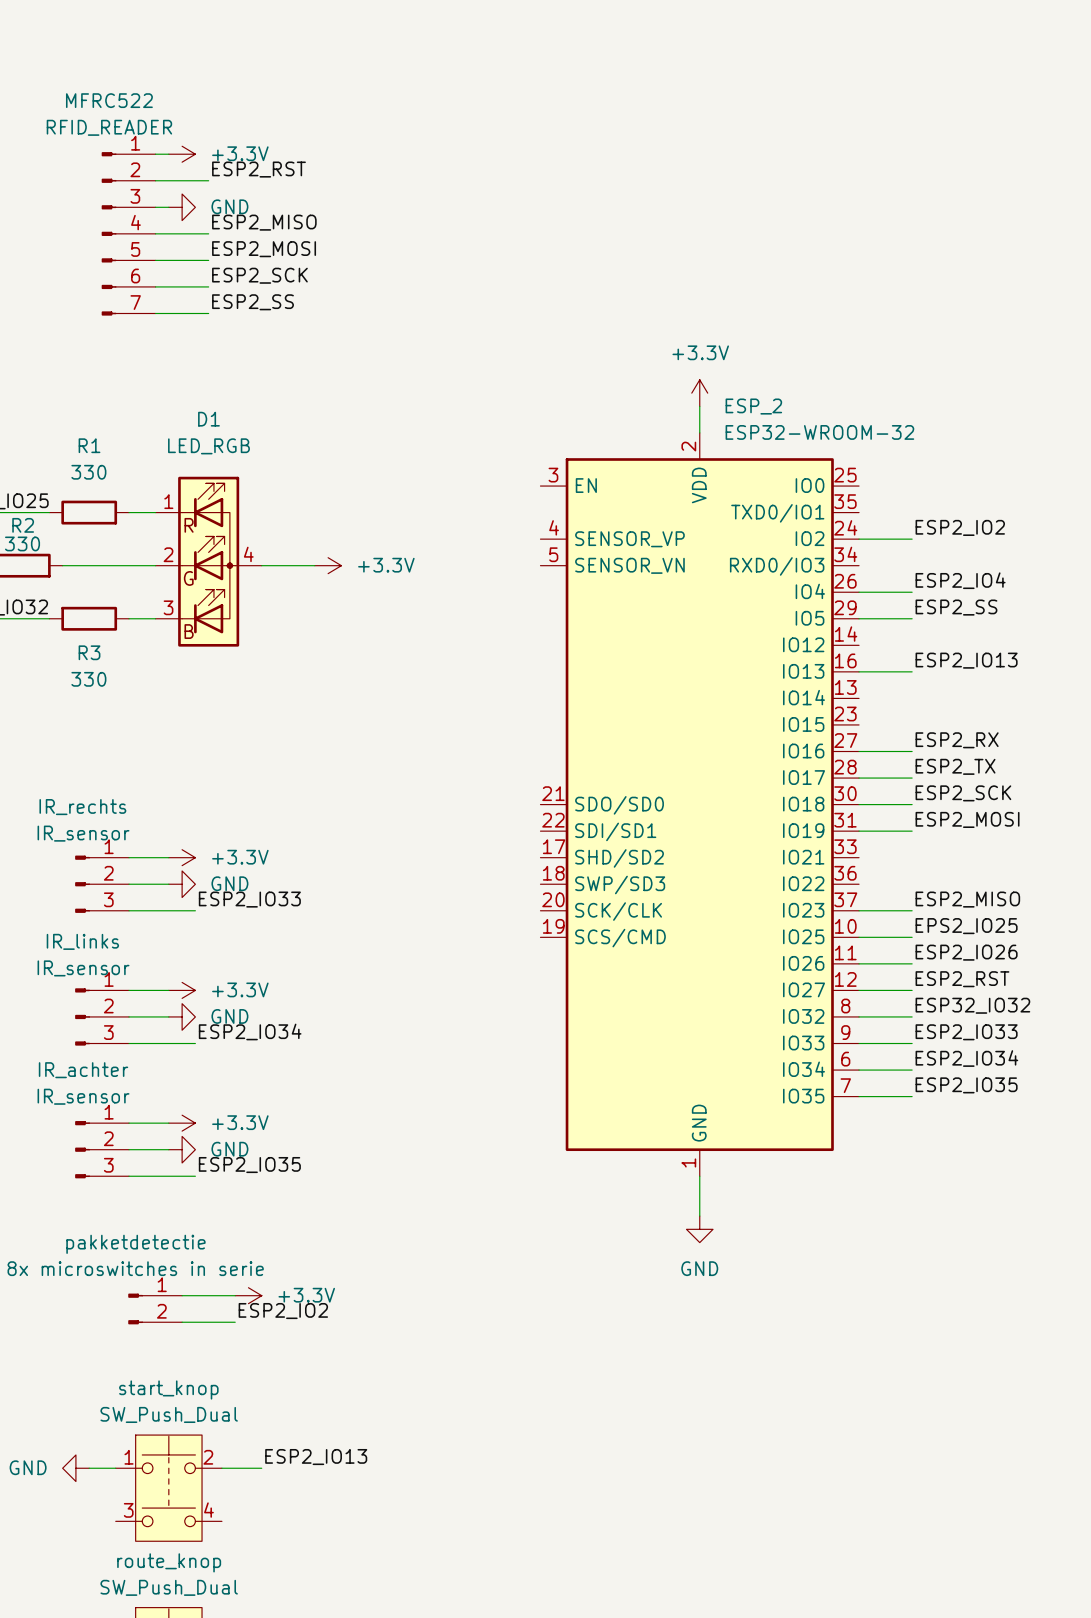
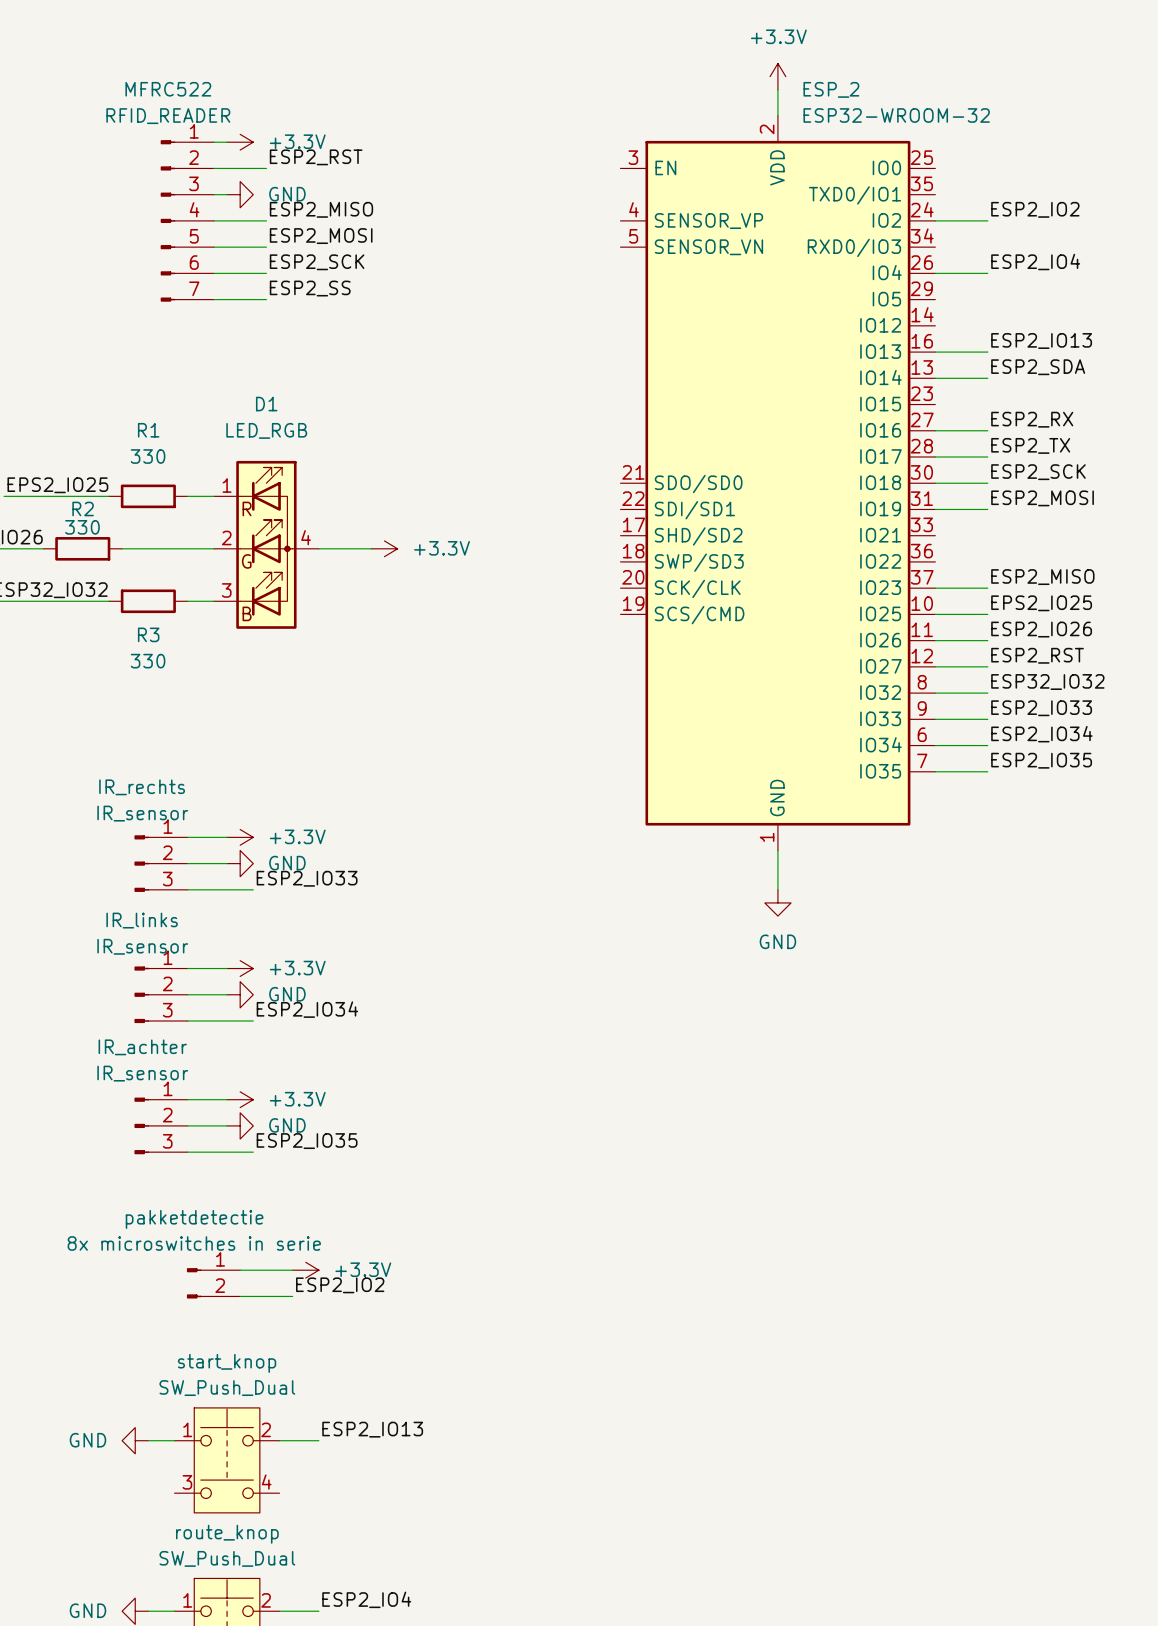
power symbol: none -> +3.3V (777, 76)
wire: none -> (777, 89) (777, 115)
label: none -> ESP2_IO2 (1035, 209)
wire: none -> (935, 220) (987, 220)
label: none -> ESP2_IO4 (1035, 261)
wire: none -> (935, 273) (987, 273)
label: none -> ESP2_IO13 (1041, 340)
wire: none -> (935, 352) (987, 352)
label: none -> ESP2_SDA (1038, 367)
power symbol: +3.3V (699, 393) -> none
label: none -> ESP2_RX (1032, 419)
label: none -> ESP2_TX (1030, 445)
label: none -> ESP2_SCK (1038, 472)
wire: none -> (935, 483) (987, 483)
label: ESP2_IO2 (960, 527) -> ESP2_MOSI (1042, 498)
wire: (859, 539) (912, 539) -> (935, 378) (987, 378)
label: ESP2_IO4 (960, 580) -> none
wire: (859, 592) (912, 592) -> (935, 430) (987, 430)
label: none -> ESP2_MISO (1042, 577)
label: ESP2_SS (956, 607) -> none
wire: (859, 618) (912, 618) -> (935, 457) (987, 457)
label: none -> EPS2_IO25 (1041, 603)
label: ESP2_IO13 (966, 660) -> ESP2_IO26 (1041, 629)
wire: (859, 671) (912, 671) -> (935, 509) (987, 509)
label: none -> ESP2_RST (1037, 655)
label: none -> ESP32_IO32 (1047, 682)
wire: none -> (935, 693) (987, 693)
label: none -> ESP2_IO33 (1041, 708)
label: ESP2_RX (957, 740) -> none
wire: (859, 751) (912, 751) -> (935, 588) (987, 588)
label: none -> ESP2_IO34 (1041, 734)
label: ESP2_TX (955, 766) -> none
wire: (859, 778) (912, 778) -> (935, 614) (987, 614)
label: none -> ESP2_IO35 (1041, 760)
label: ESP2_SCK (963, 793) -> none
ESP_2 position: (699, 804) -> (777, 483)
wire: (859, 804) (912, 804) -> (935, 640) (987, 640)
label: ESP2_MOSI (967, 819) -> none
wire: (859, 831) (912, 831) -> (935, 666) (987, 666)
label: ESP2_MISO (967, 899) -> none
wire: (859, 910) (912, 910) -> (935, 745) (987, 745)
power symbol: none -> GND (777, 902)
label: EPS2_IO25 (966, 926) -> none
wire: (859, 937) (912, 937) -> (935, 771) (987, 771)
label: ESP2_IO26 (966, 952) -> none
wire: (859, 963) (912, 963) -> (935, 719) (987, 719)
label: ESP2_RST (962, 979) -> none
wire: (859, 990) (912, 990) -> none
label: ESP32_IO32 (972, 1005) -> none
wire: (859, 1016) (912, 1016) -> none
label: ESP2_IO33 (966, 1032) -> none
wire: (859, 1043) (912, 1043) -> none
label: ESP2_IO34 (966, 1058) -> none
wire: (859, 1070) (912, 1070) -> none
label: ESP2_IO35 (966, 1085) -> none
wire: (859, 1096) (912, 1096) -> none
wire: (699, 1176) (699, 1216) -> none
power symbol: GND (699, 1229) -> none

